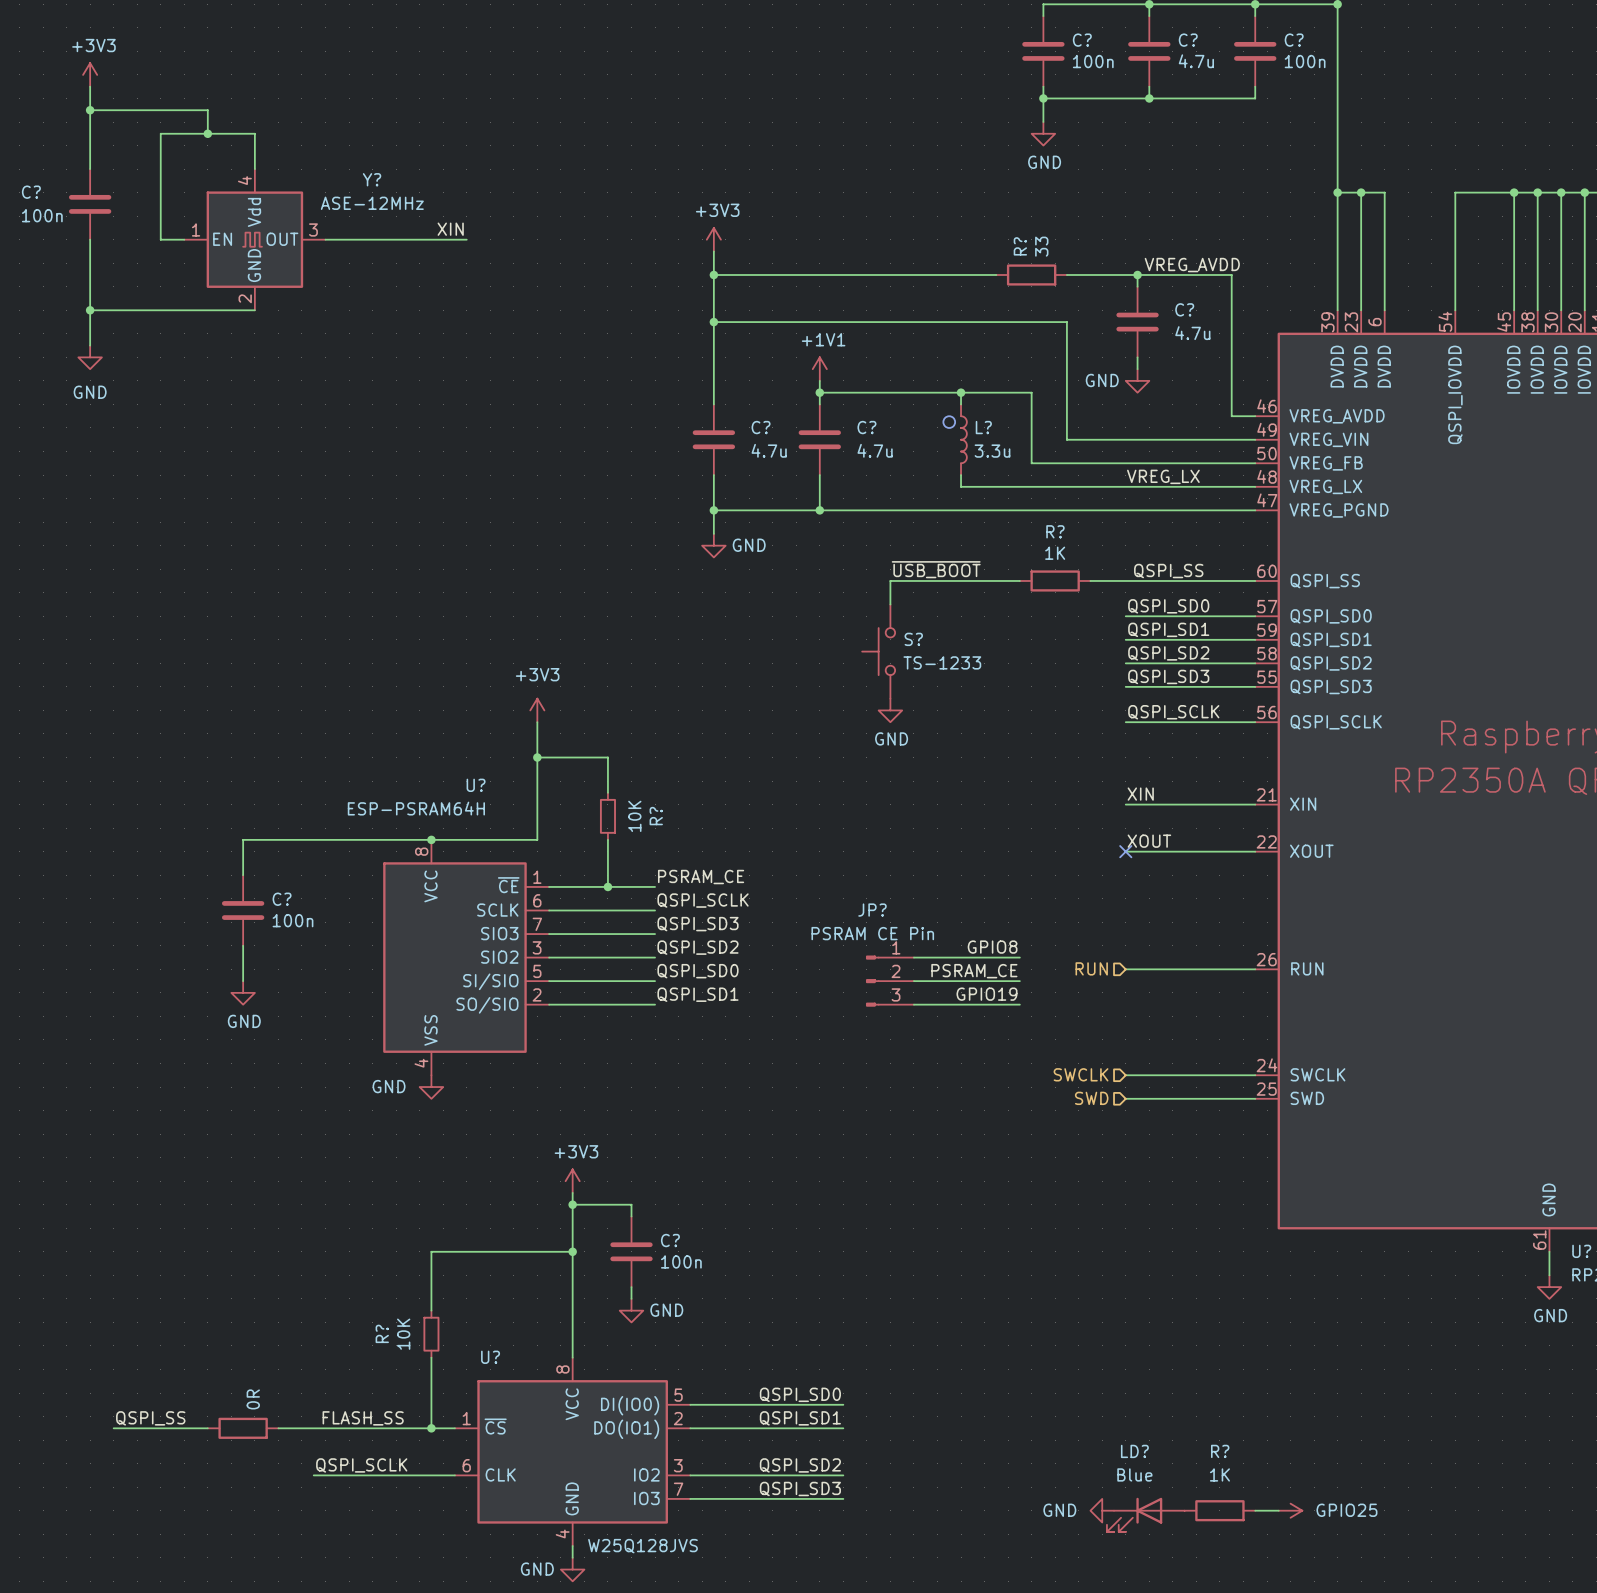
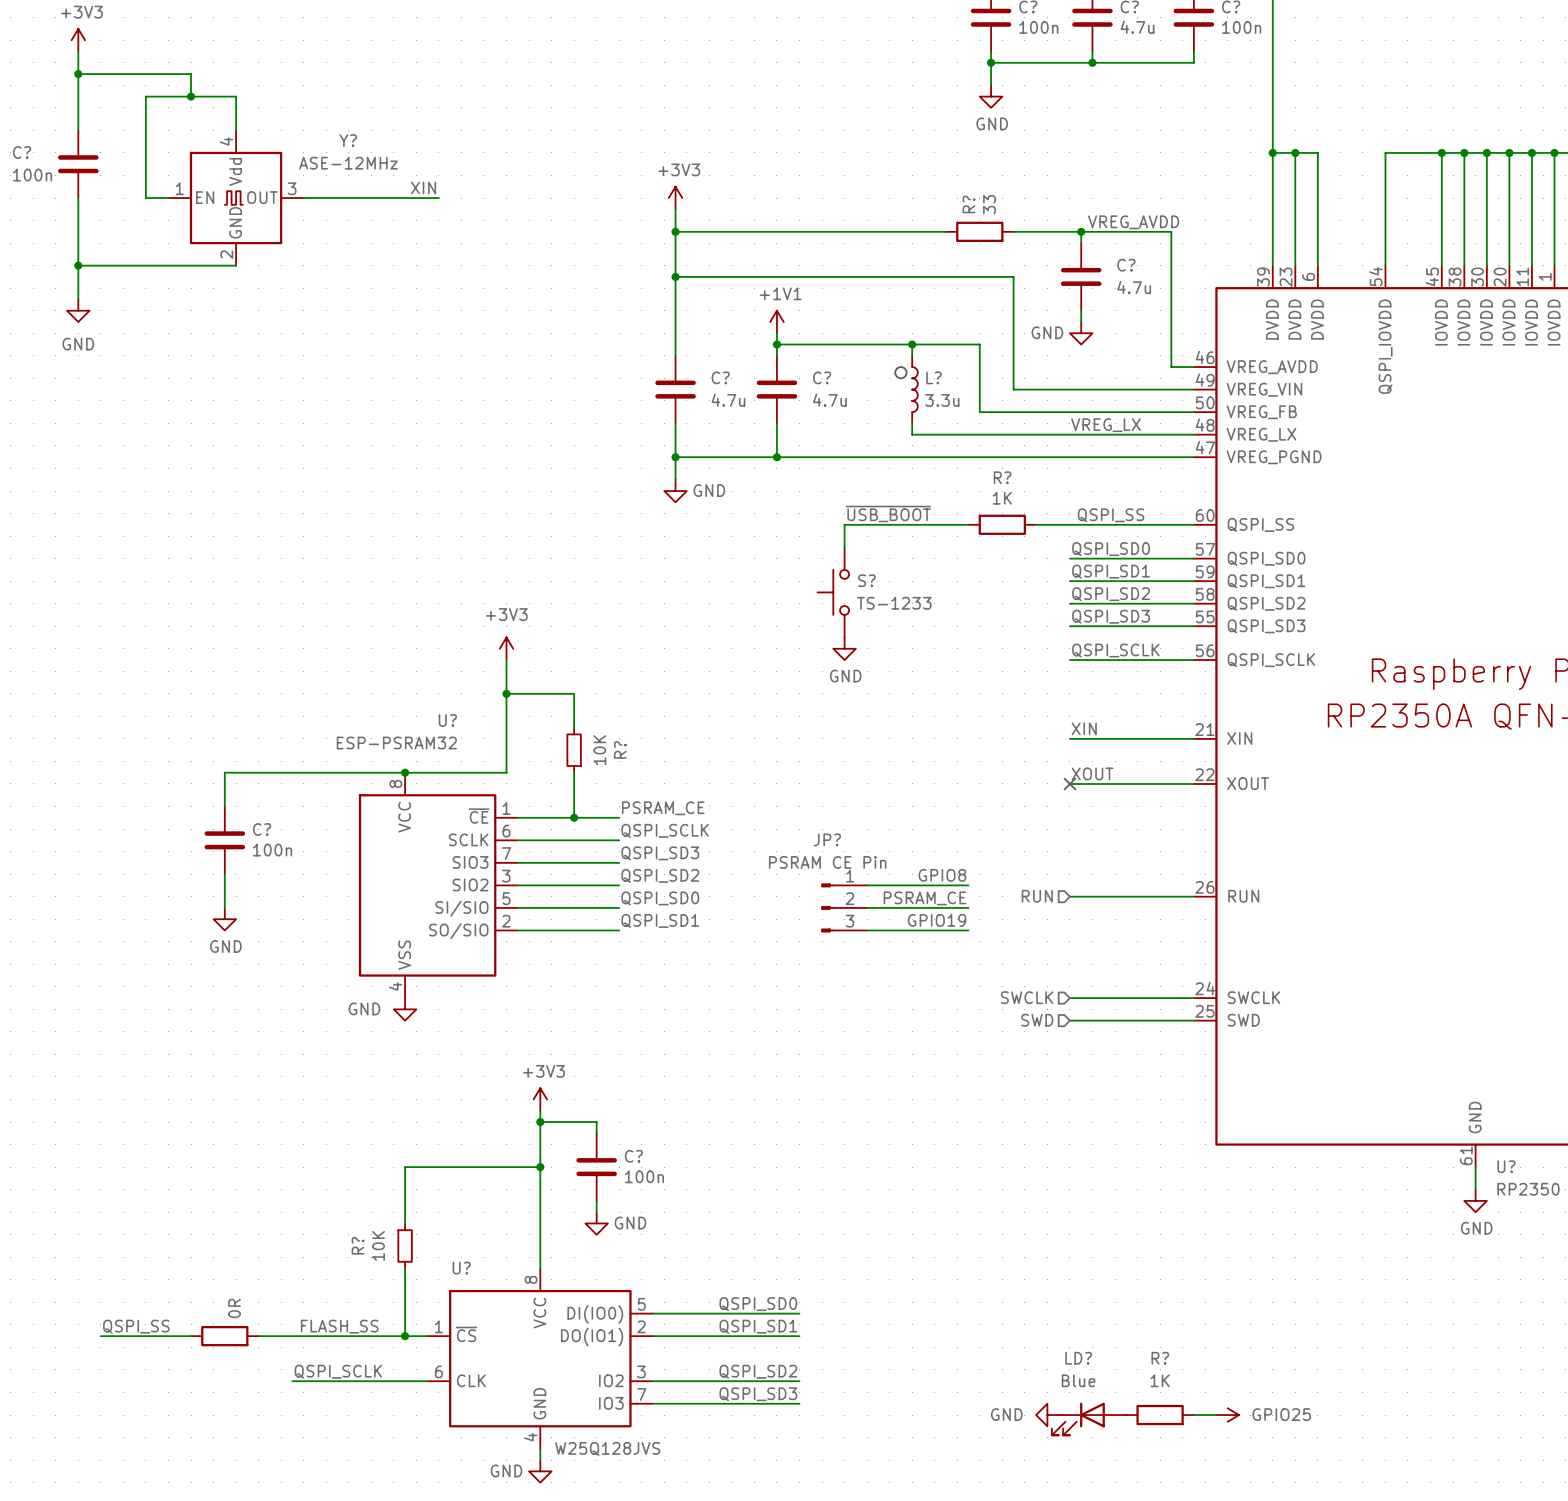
U? value: ESP-PSRAM64H (416, 808) -> ESP-PSRAM32 (396, 743)

